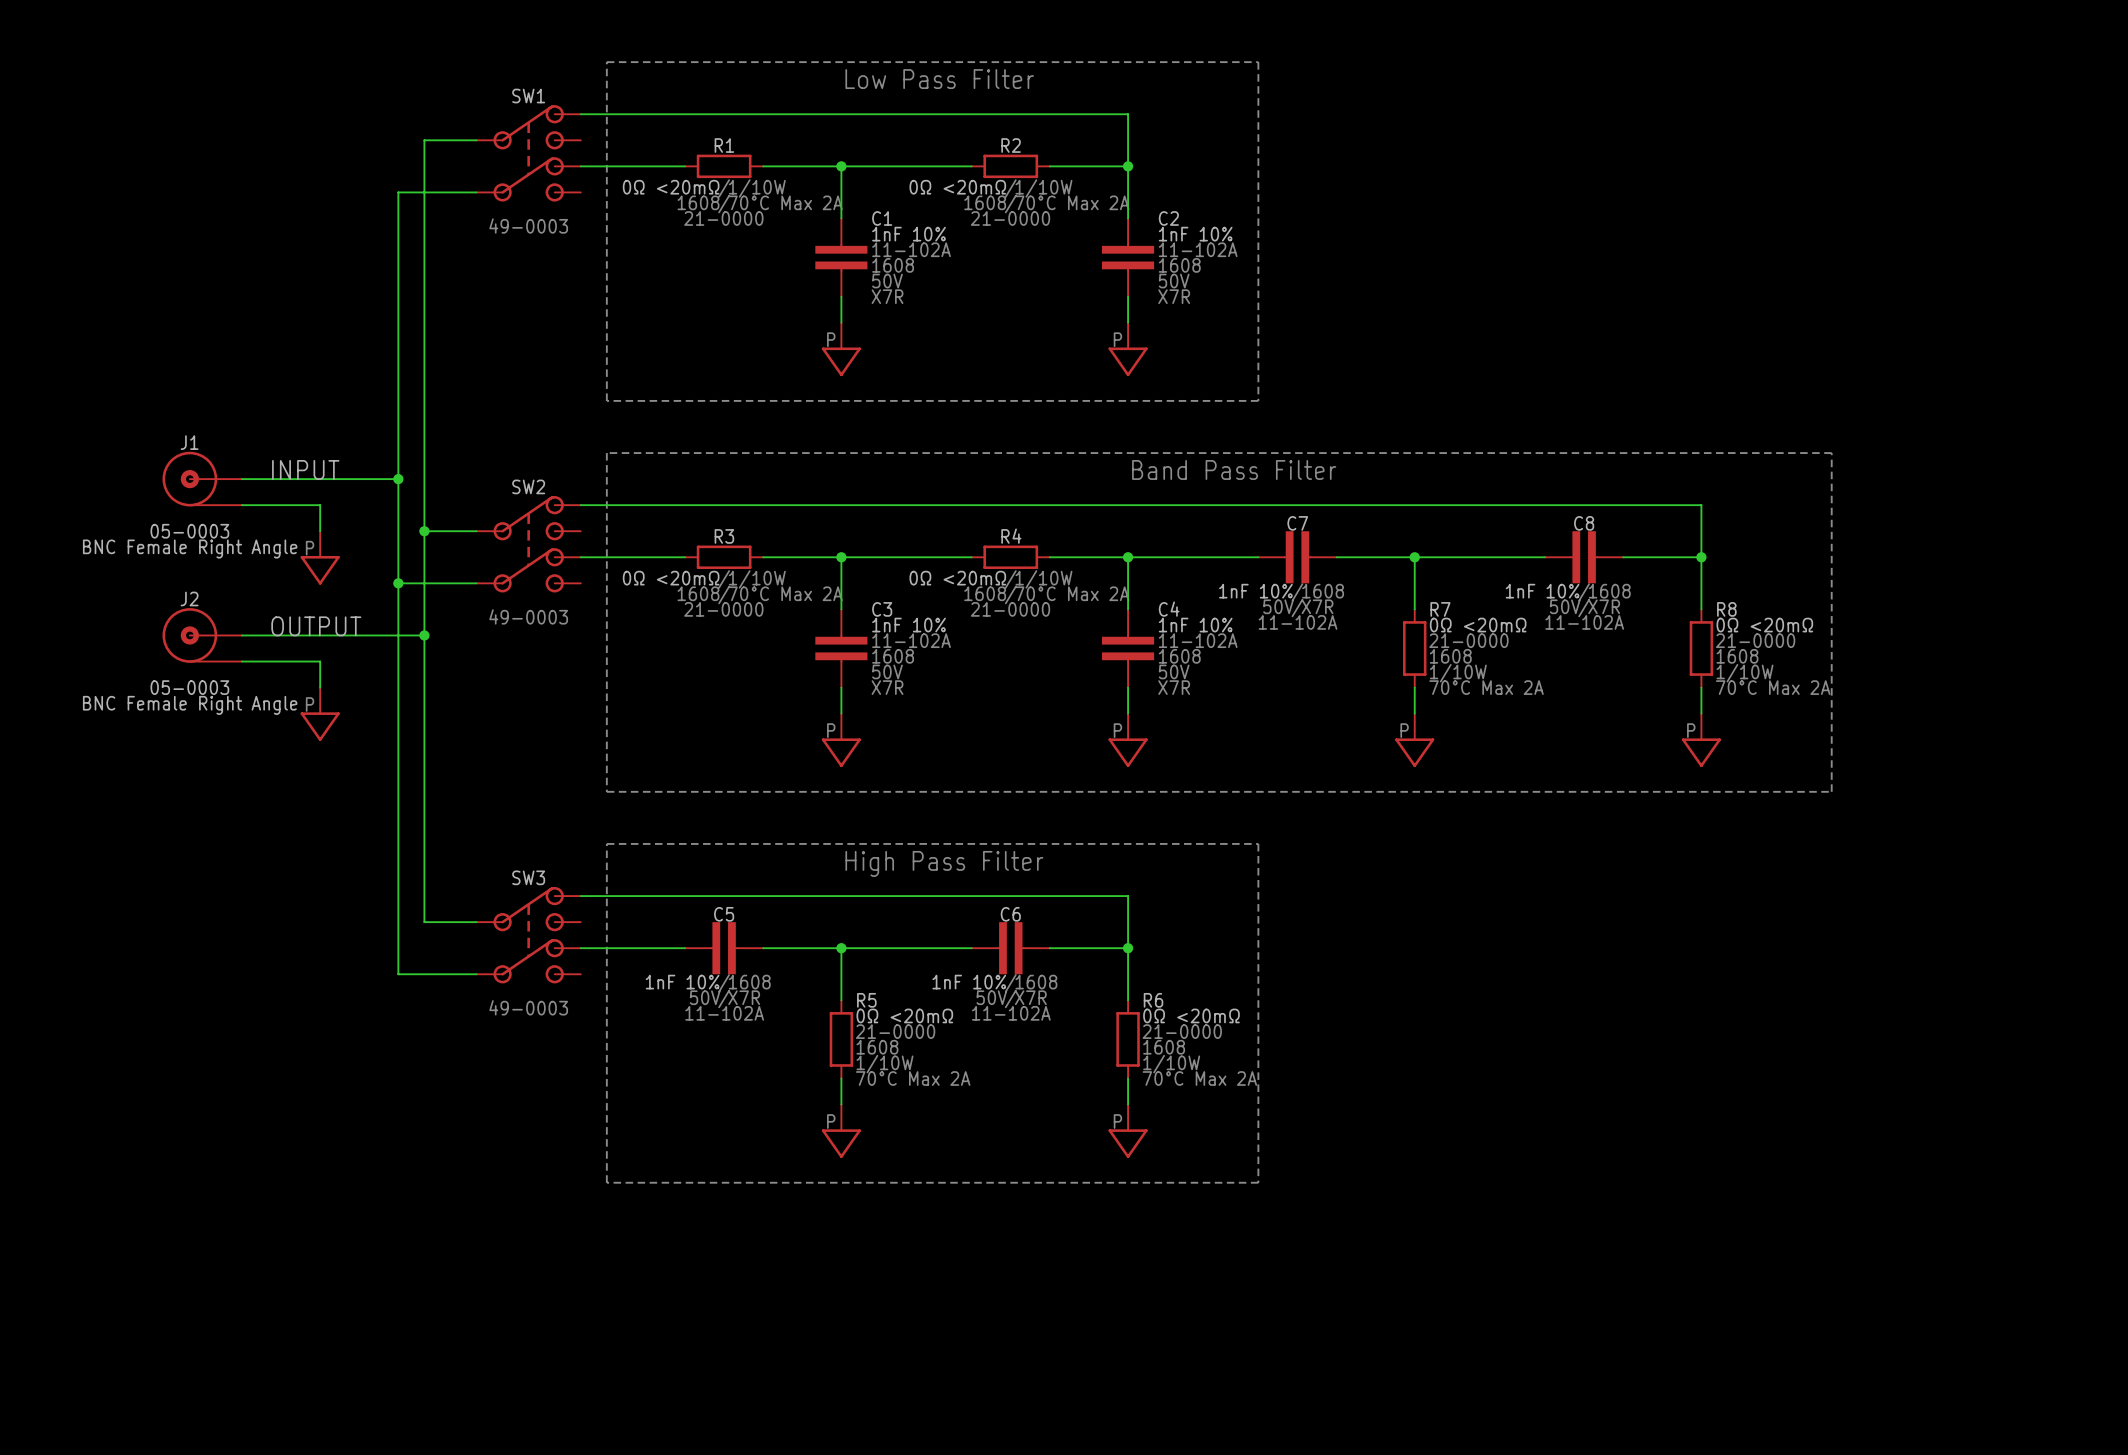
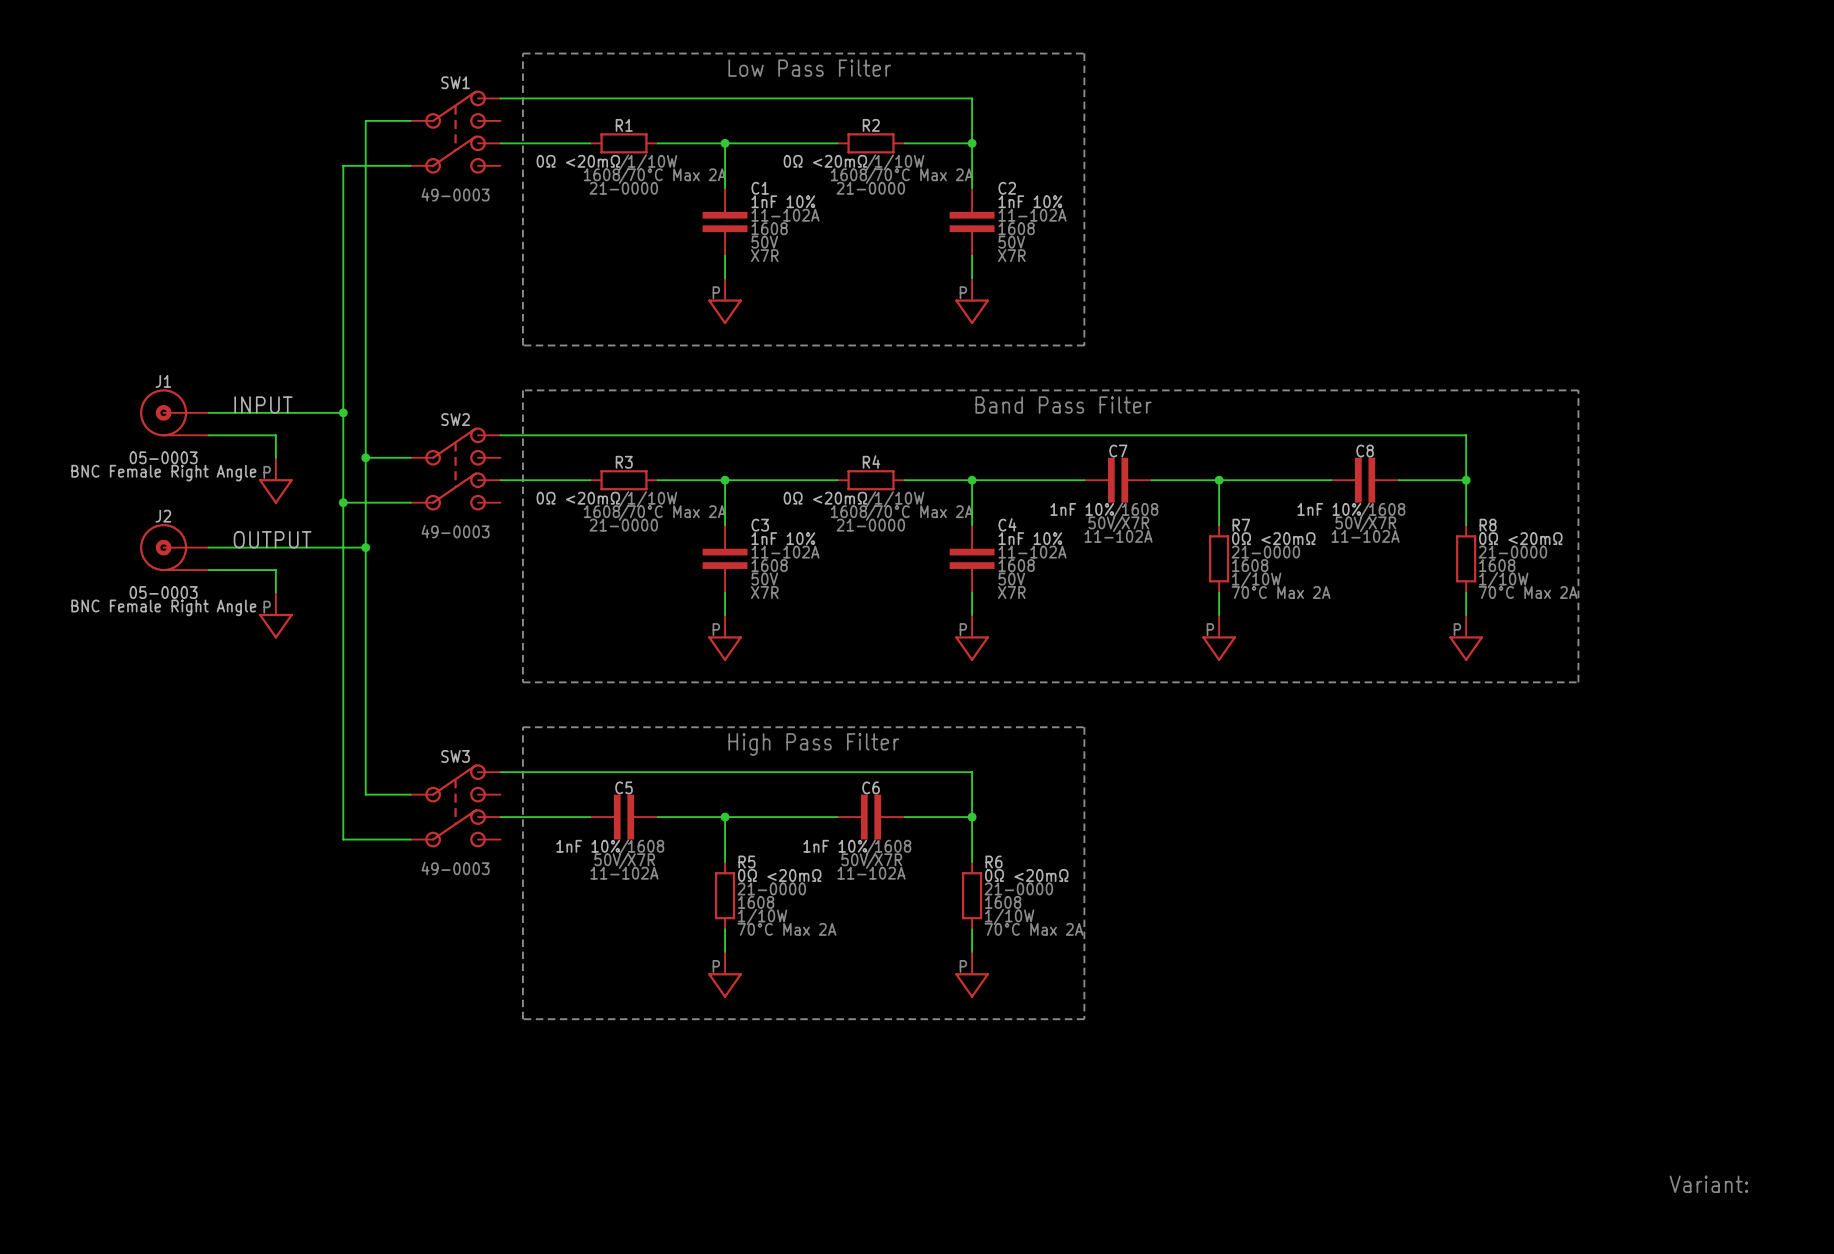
text: none -> Variant: (1708, 1184)

